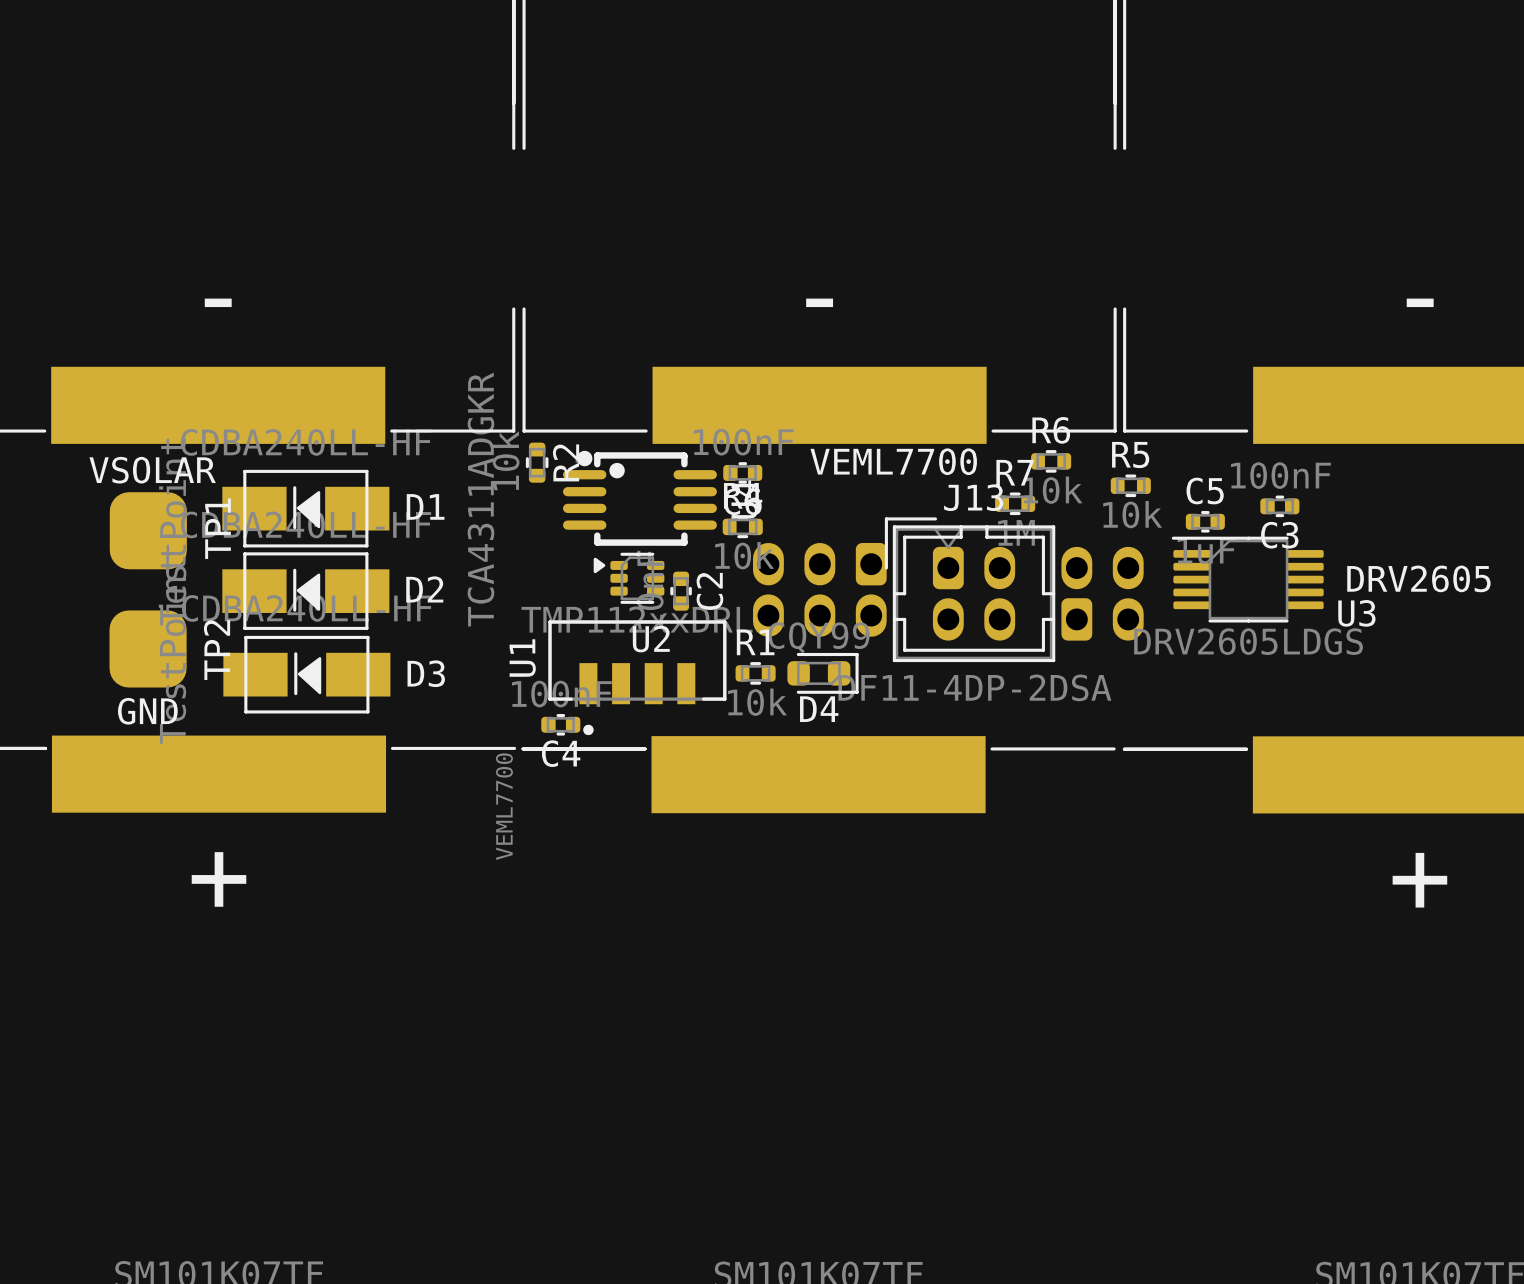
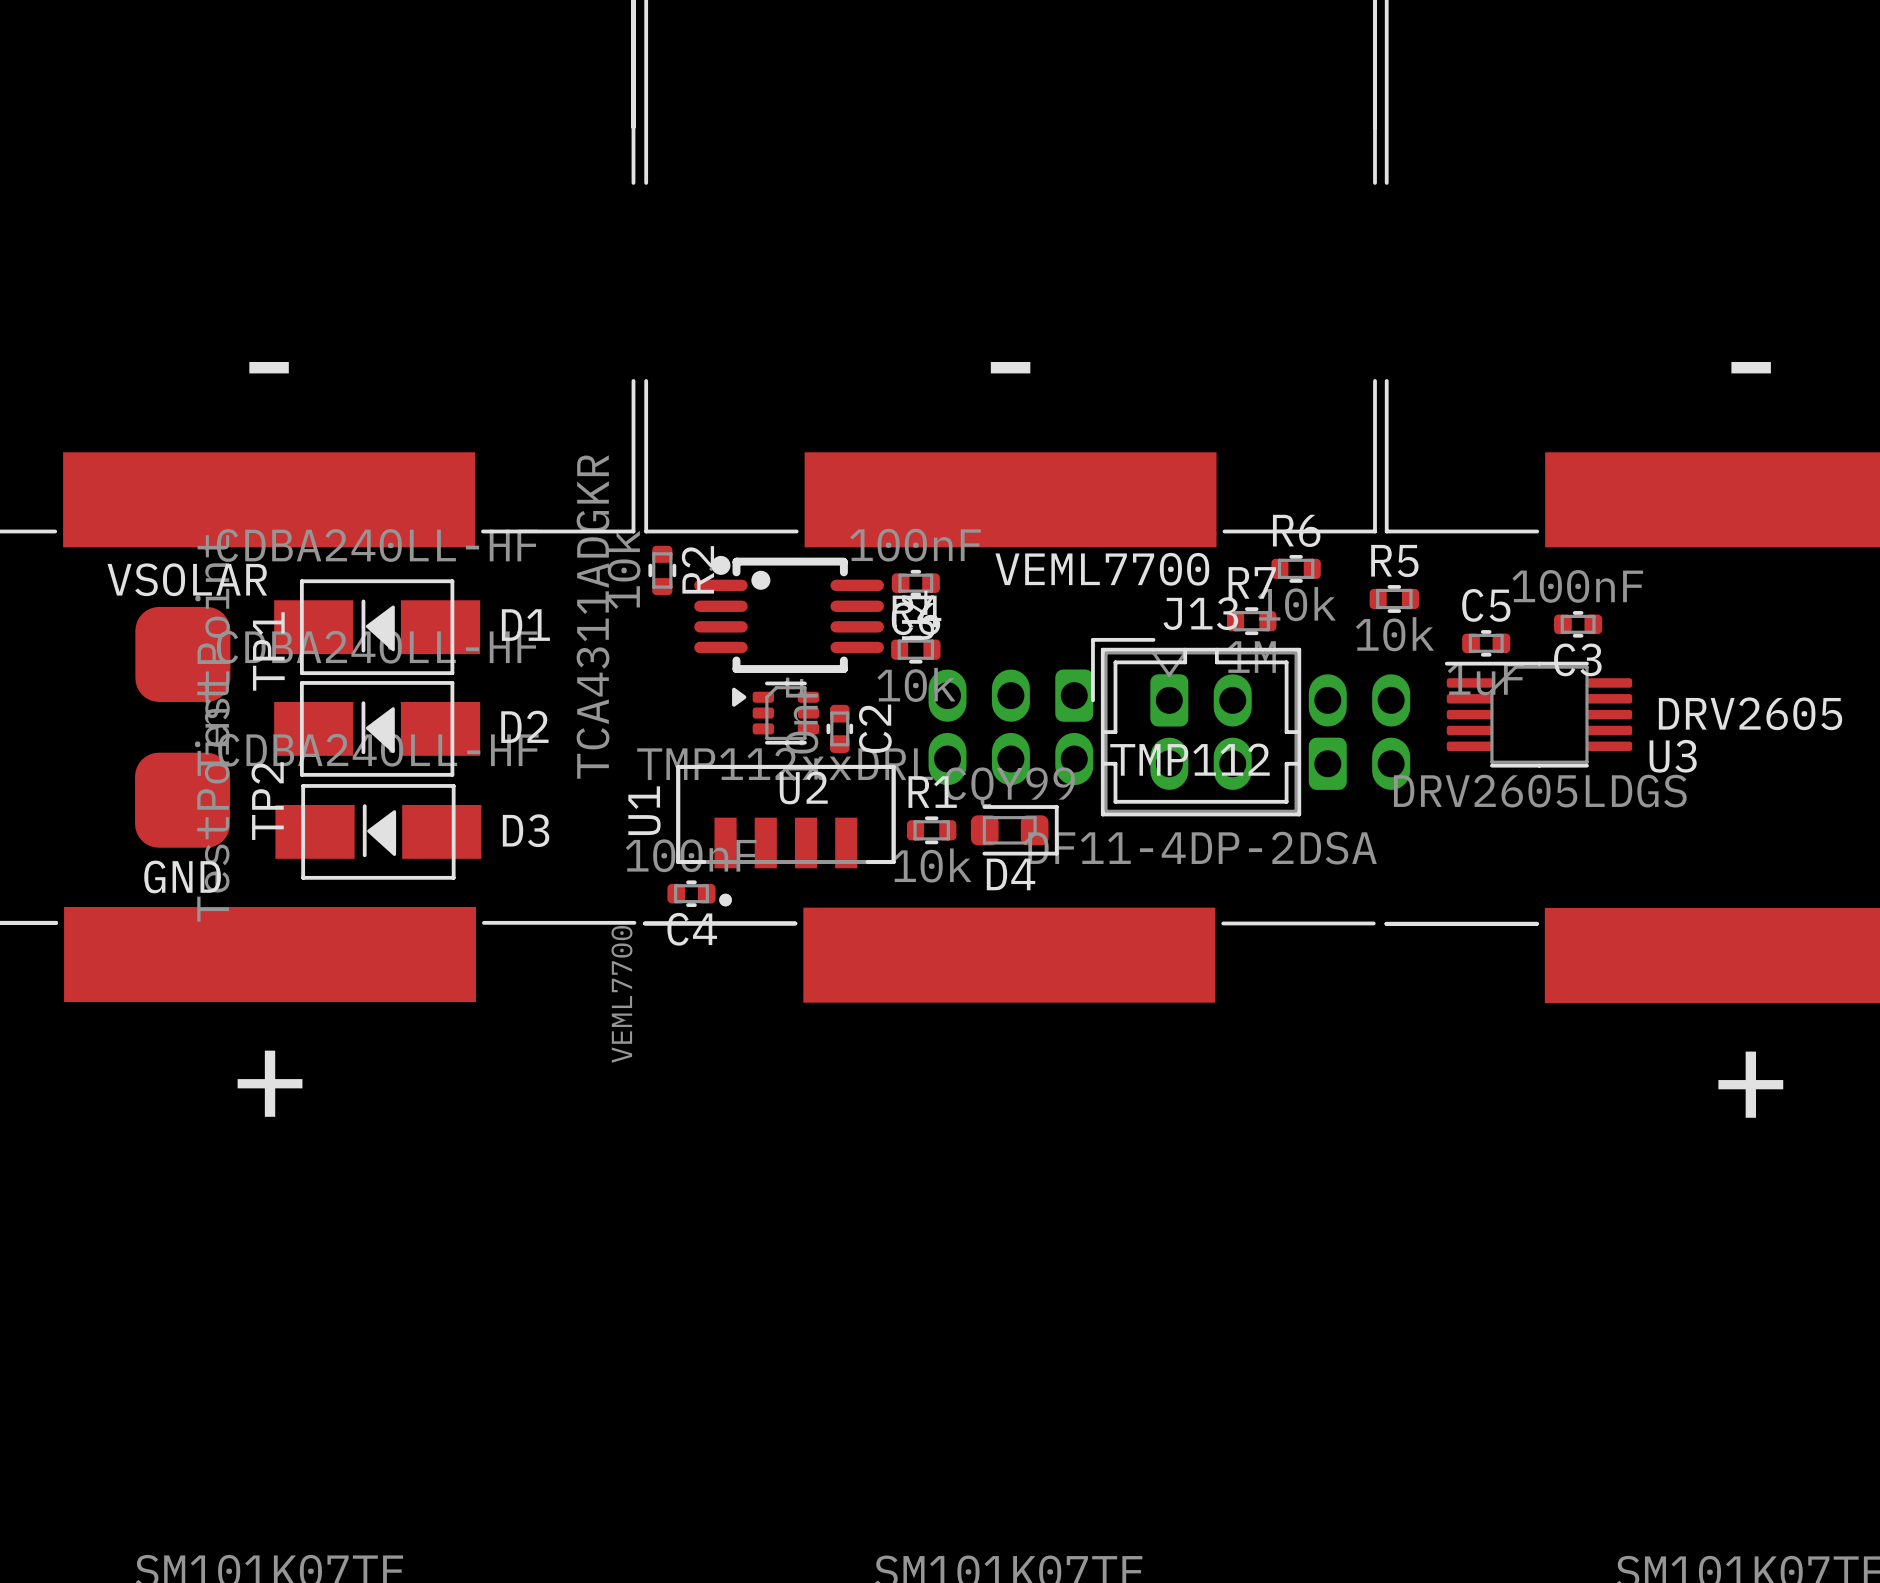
text: none -> TMP112 (1190, 759)

